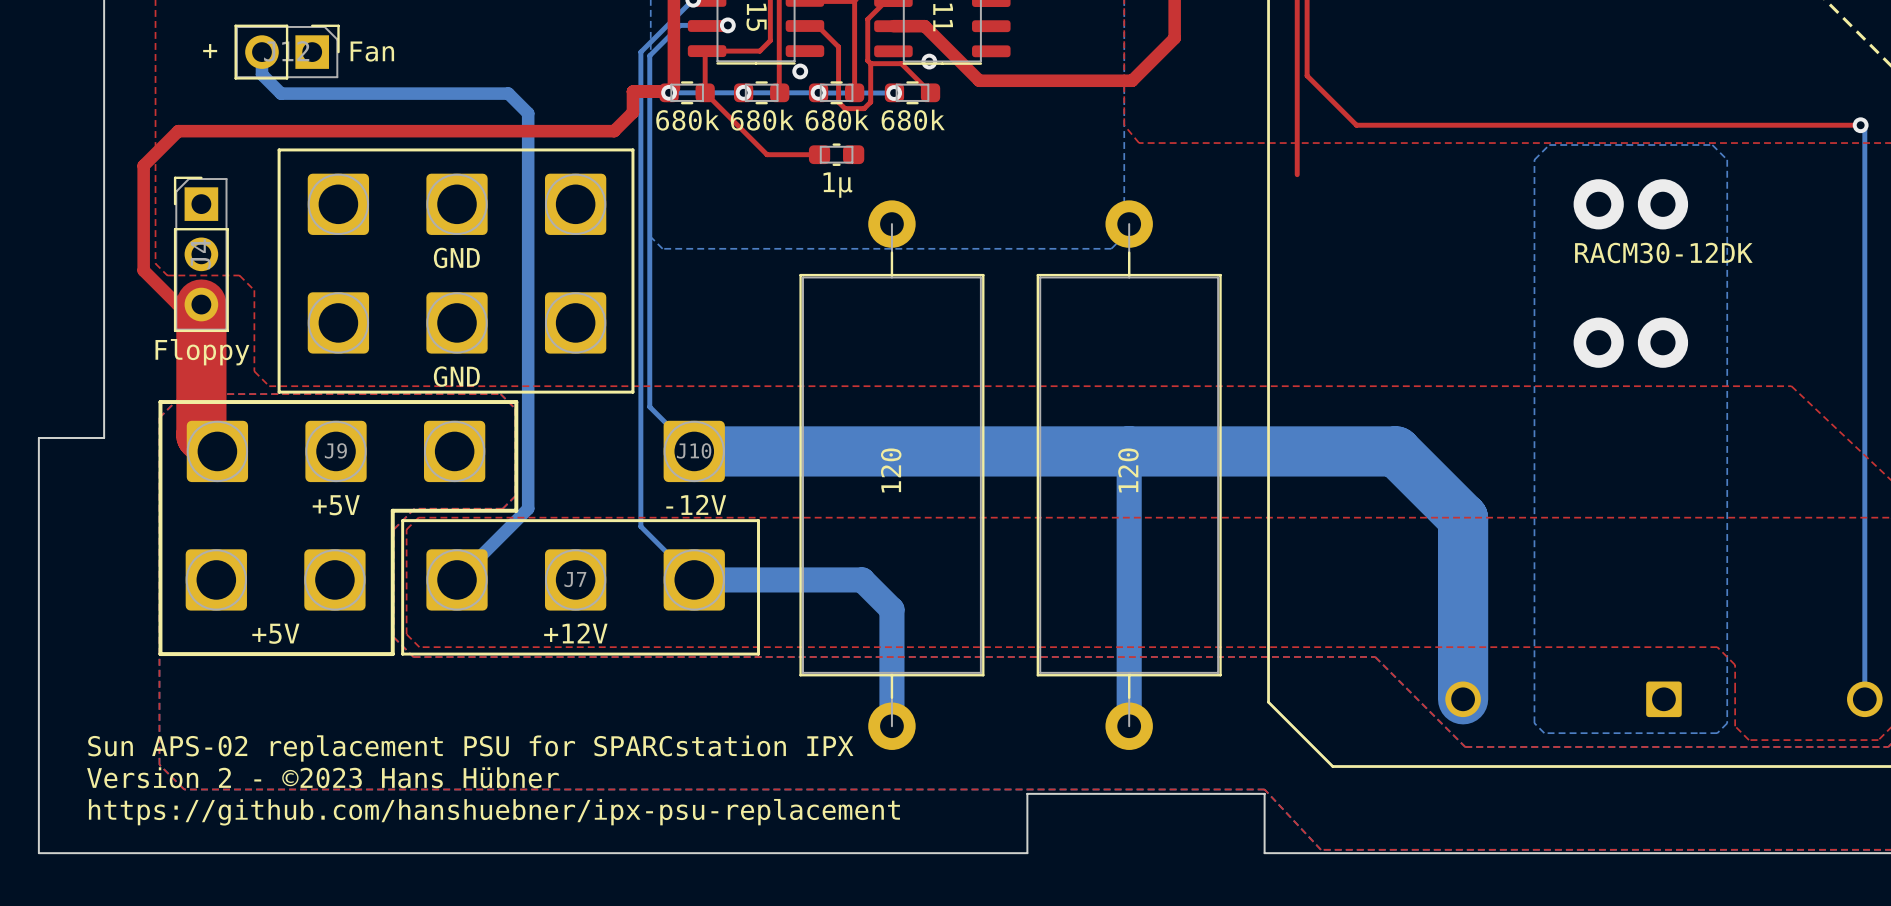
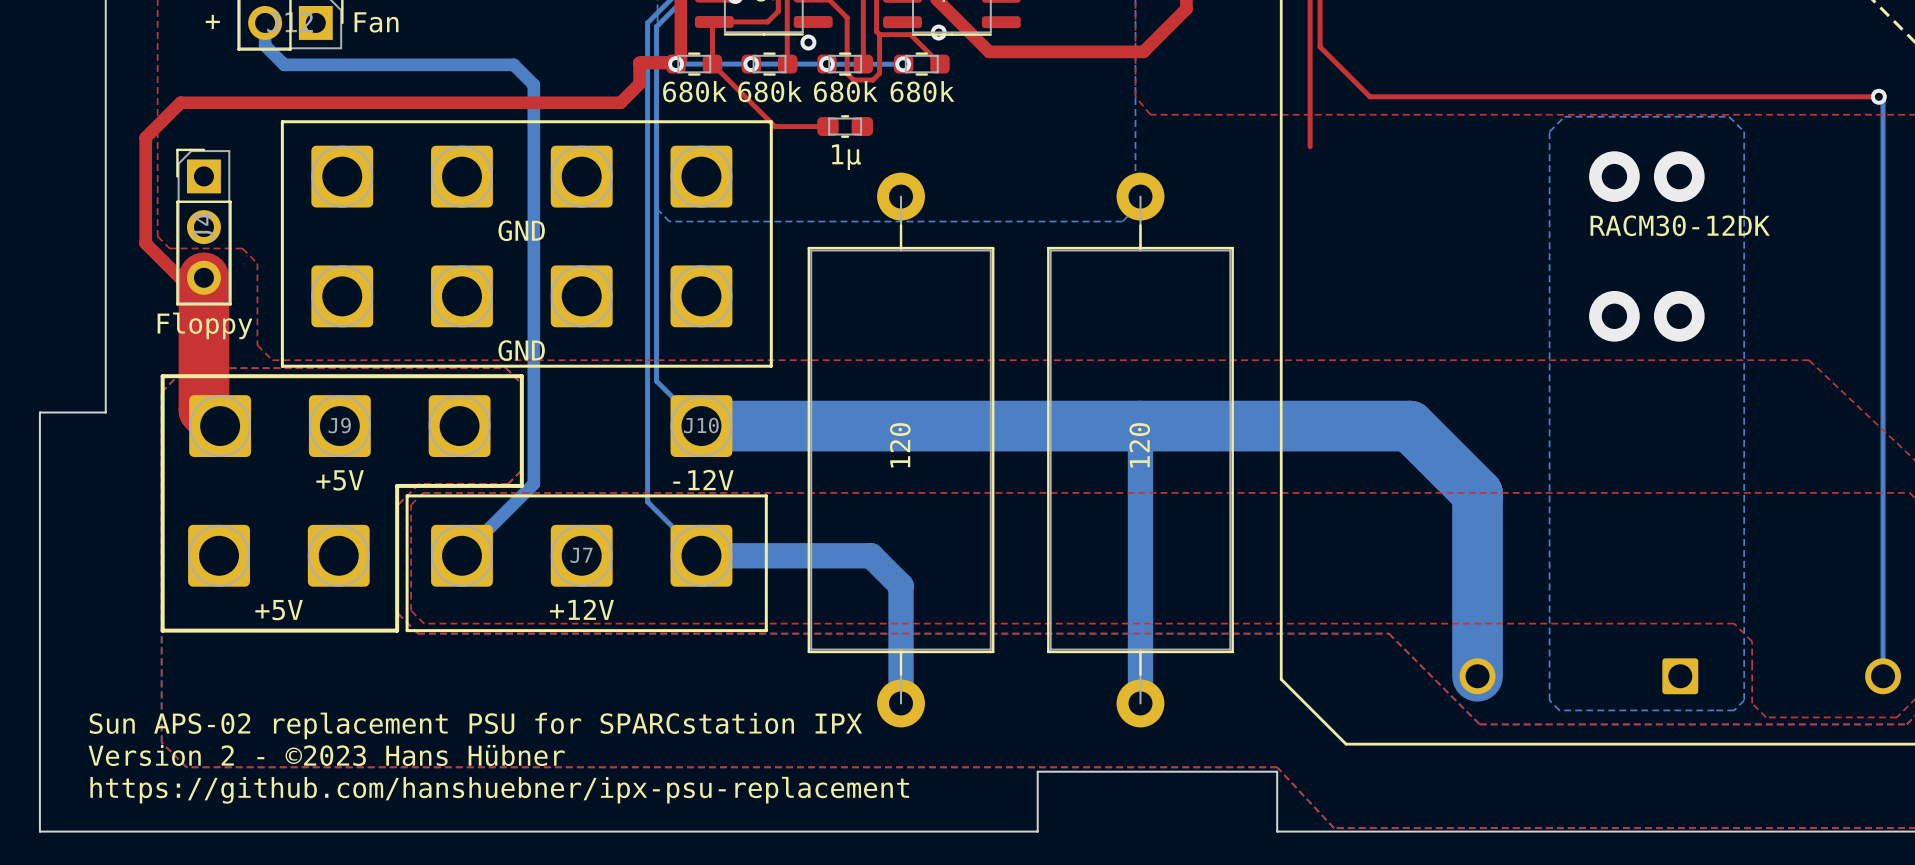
line: (632, 149) (632, 392) -> (639, 121) (771, 121) (771, 366) (639, 366)
part: GND (457, 204) -> none
part: none -> GND (521, 176)
part: GND (457, 322) -> none
part: none -> GND (521, 296)

